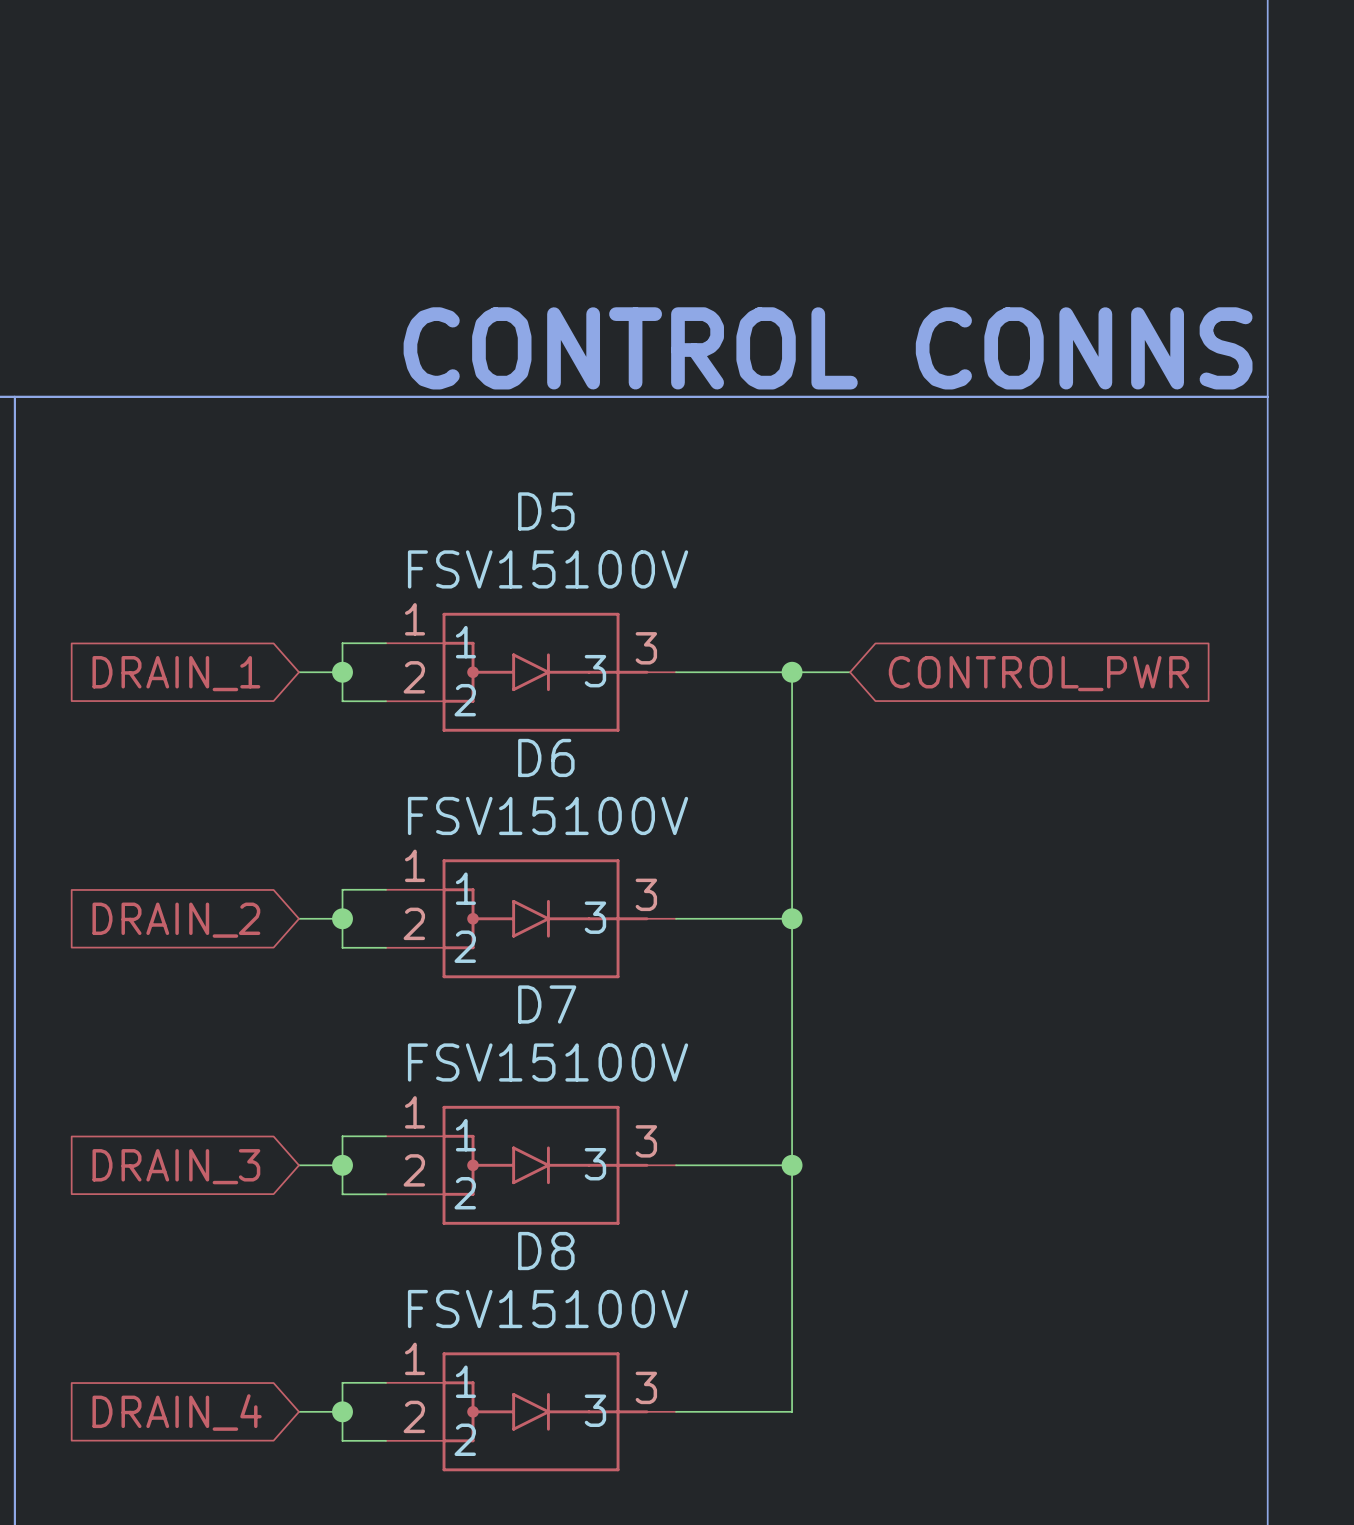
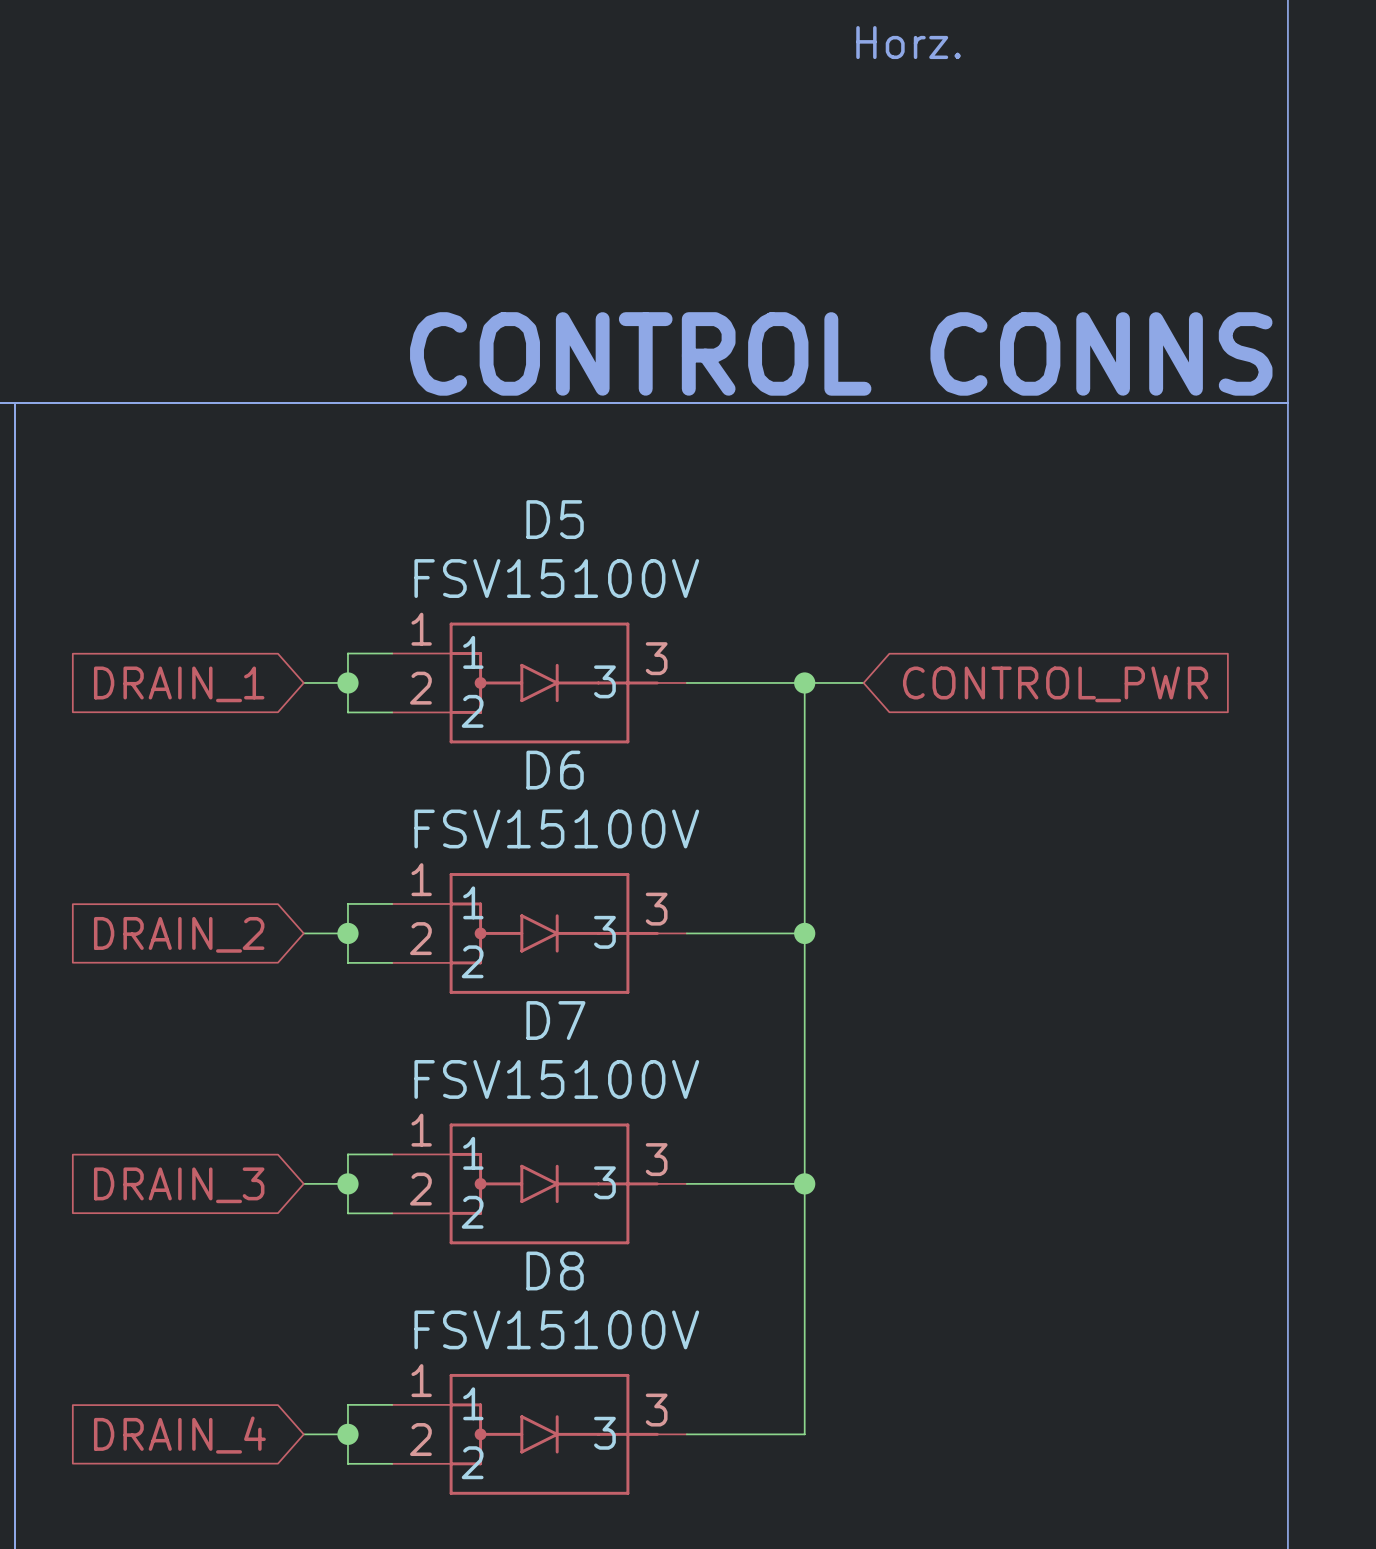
text: none -> Horz. (908, 42)

